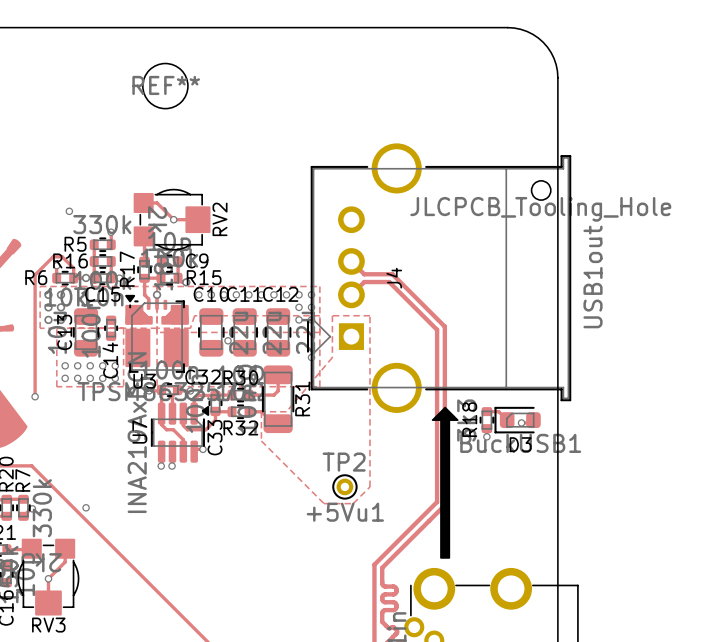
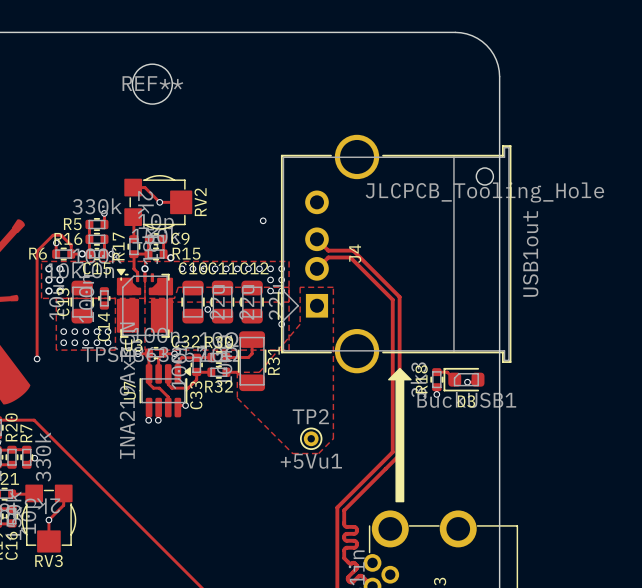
via: (69, 211) -> none
via: none -> (263, 220)
via: (86, 507) -> none

